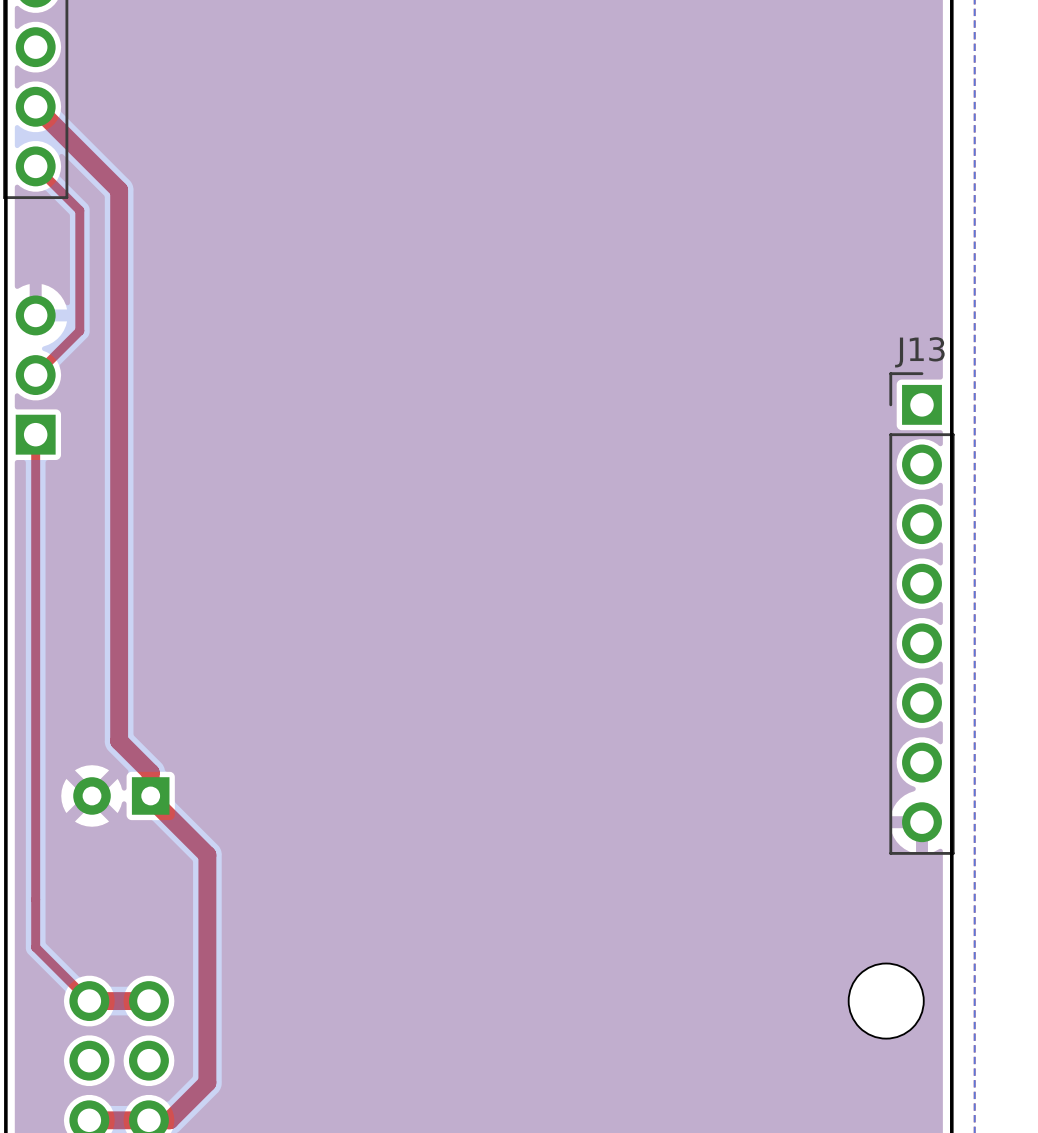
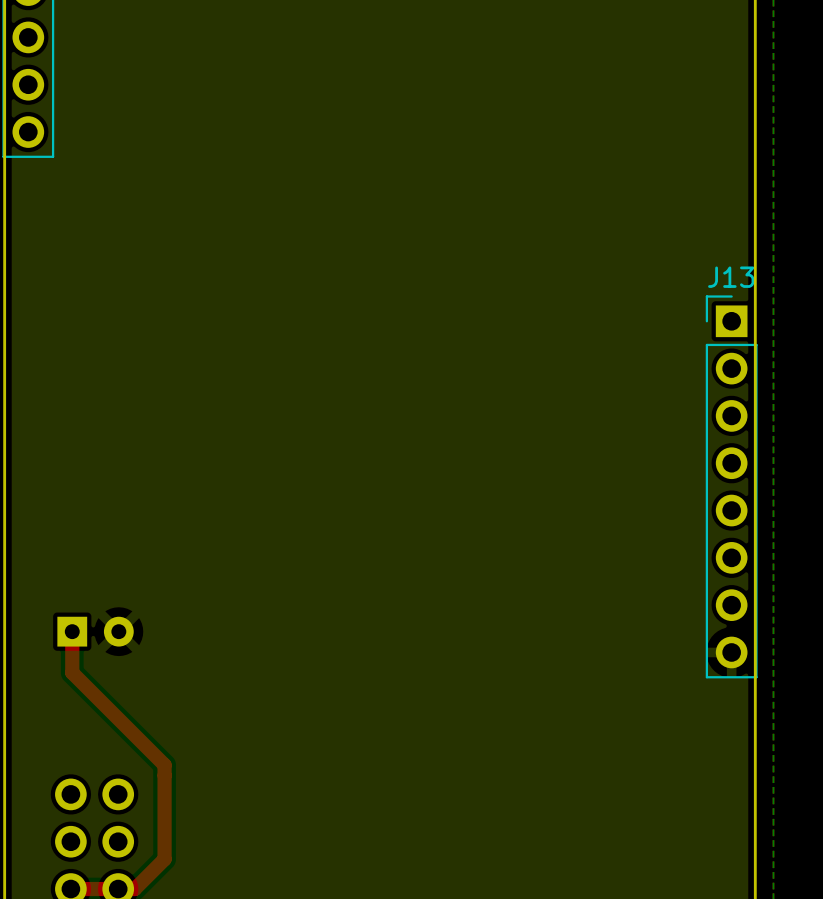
top track: (35, 106) (119, 190) (119, 741) (150, 772) (150, 798) (207, 855) (207, 964) -> (72, 631) (72, 672) (164, 765)
top track: (35, 166) (79, 210) (79, 330) (35, 375) -> none
part: (35, 375) -> none
top track: (35, 434) (35, 947) (89, 1001) (148, 1001) -> none
part rotation: 0° (121, 795) -> 180° (95, 631)
part: (886, 1001) -> none

